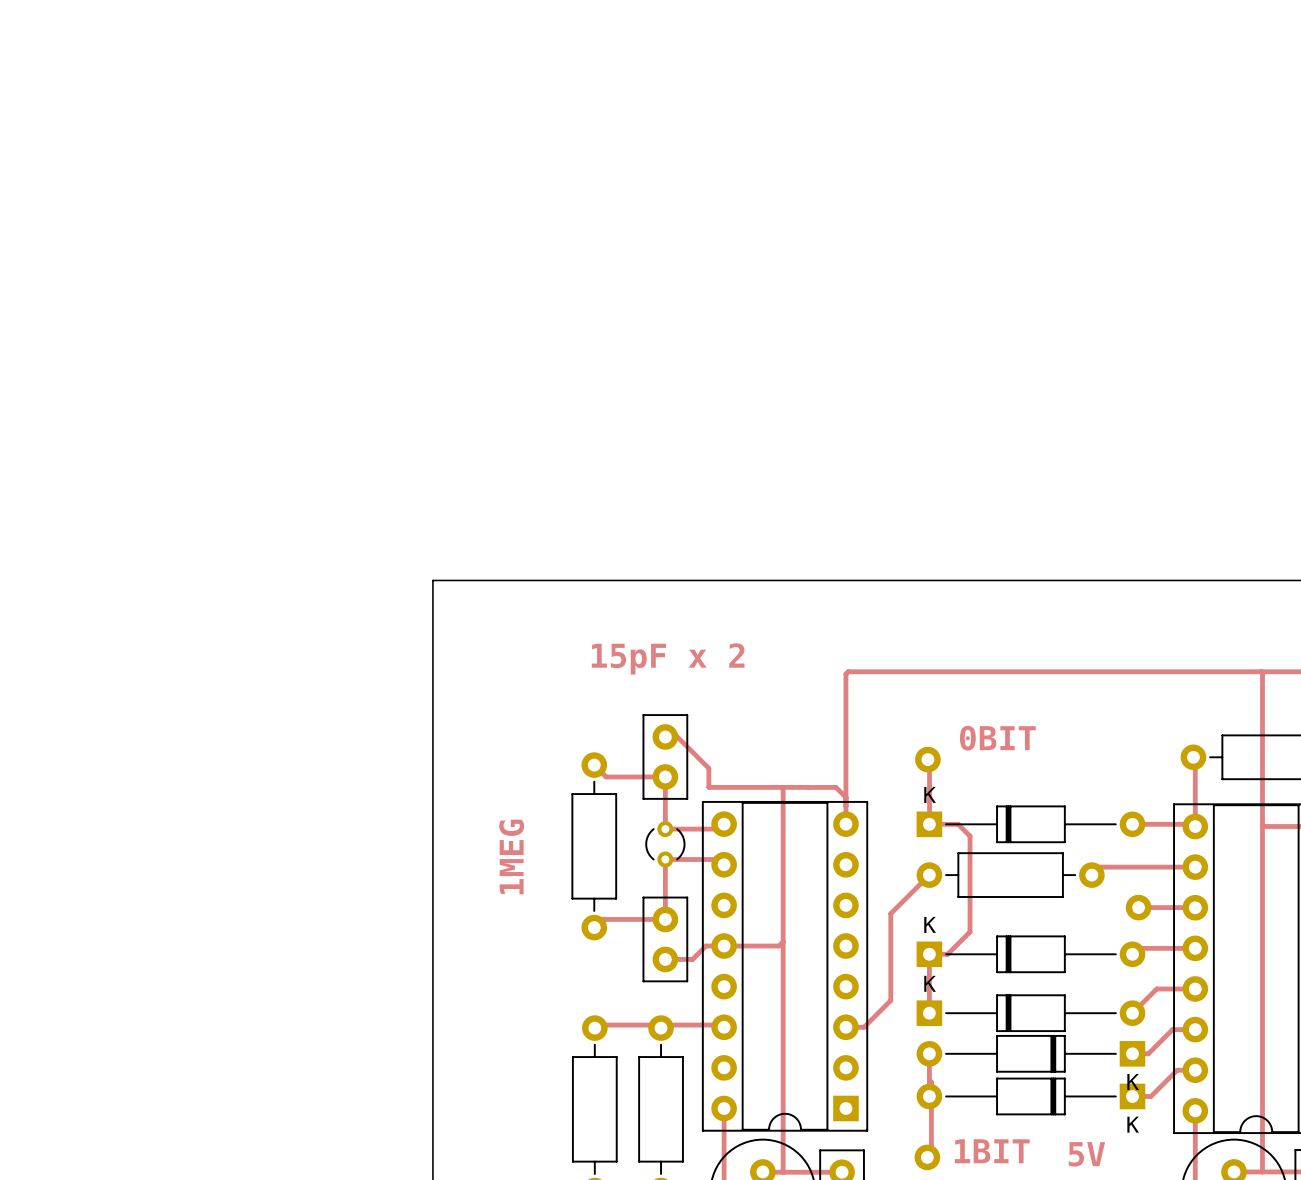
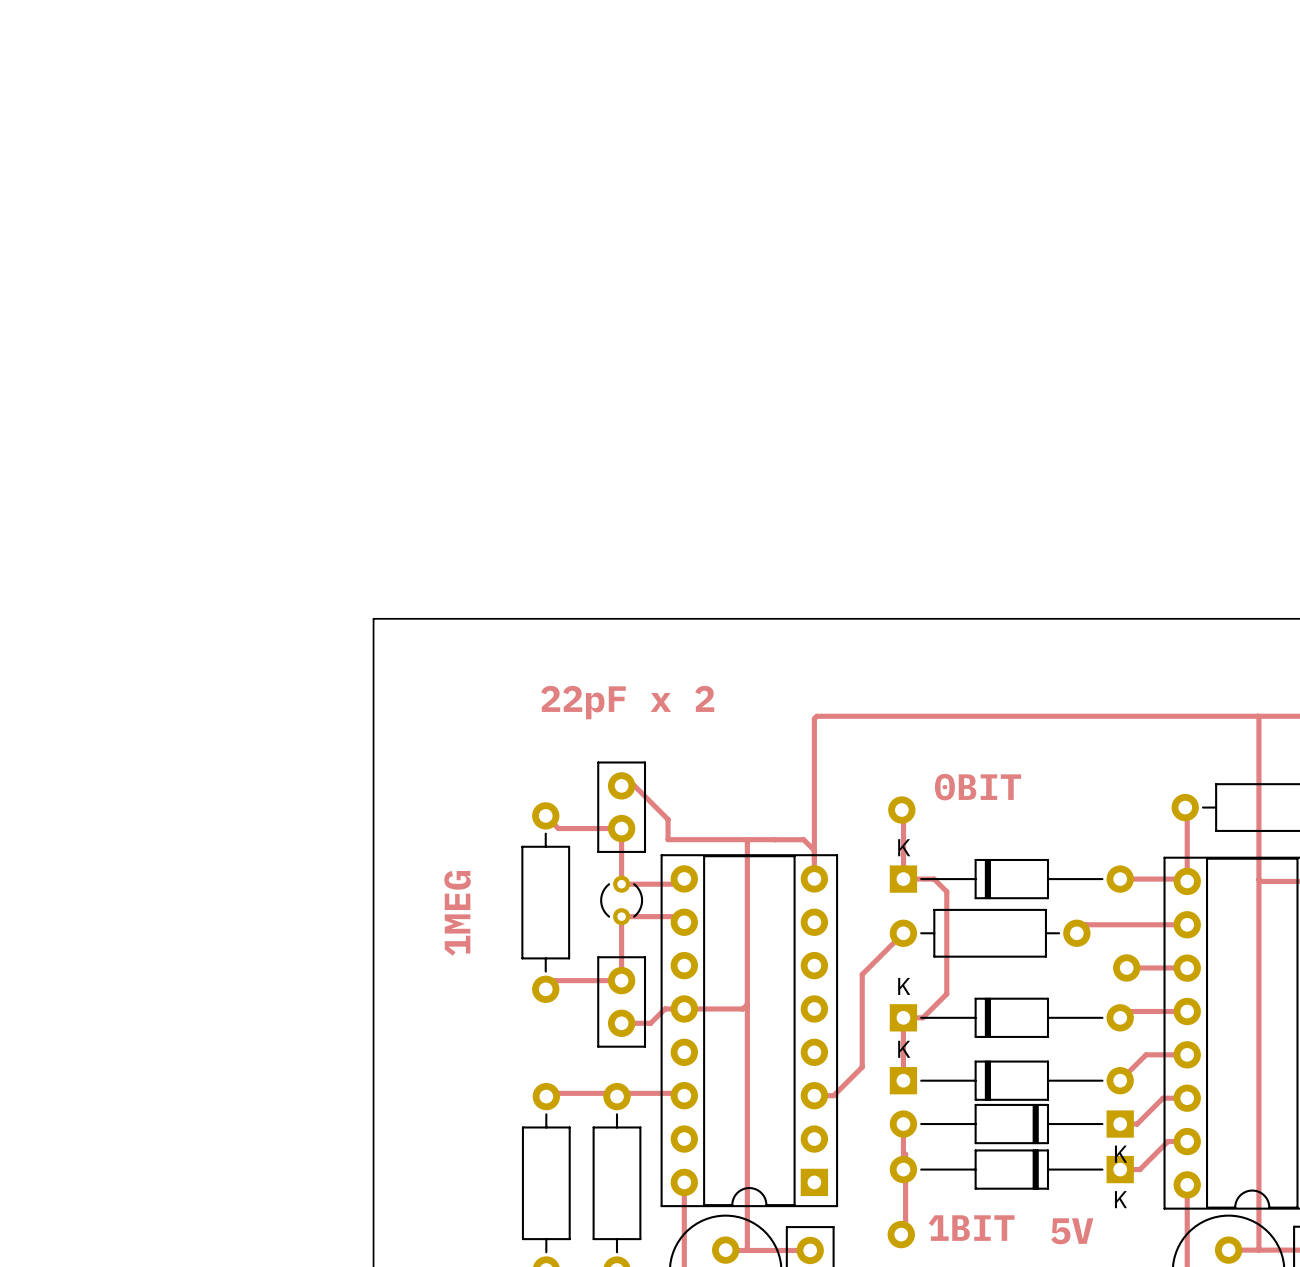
text: 15pF x 2 (668, 658) -> 22pF x 2 (627, 702)

